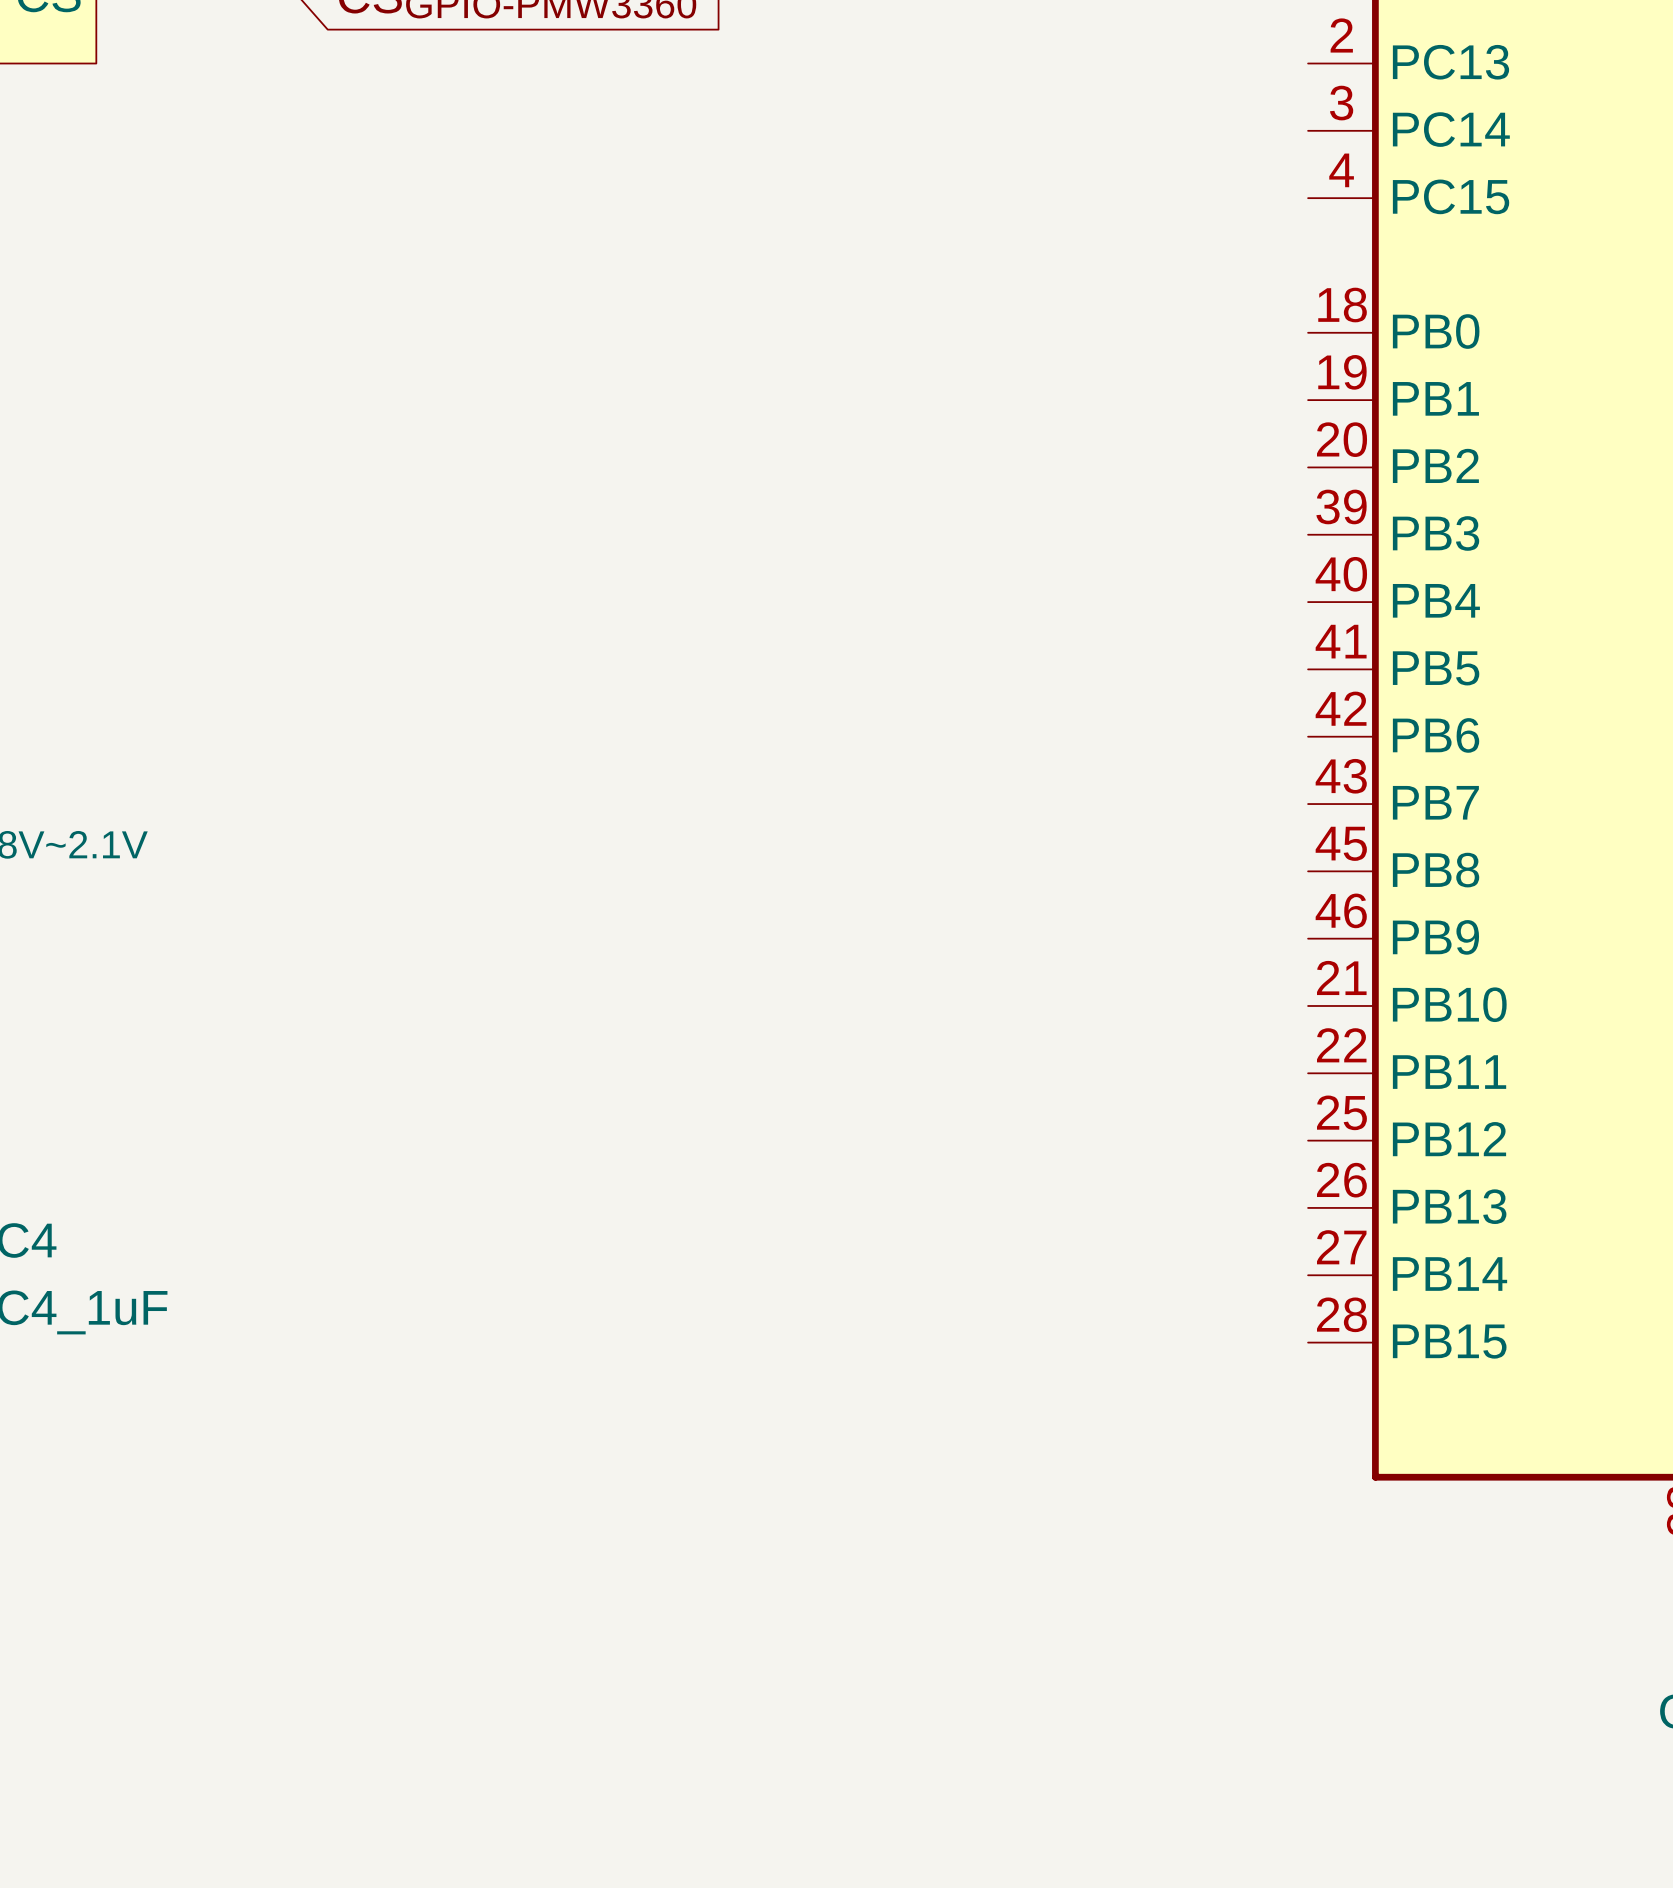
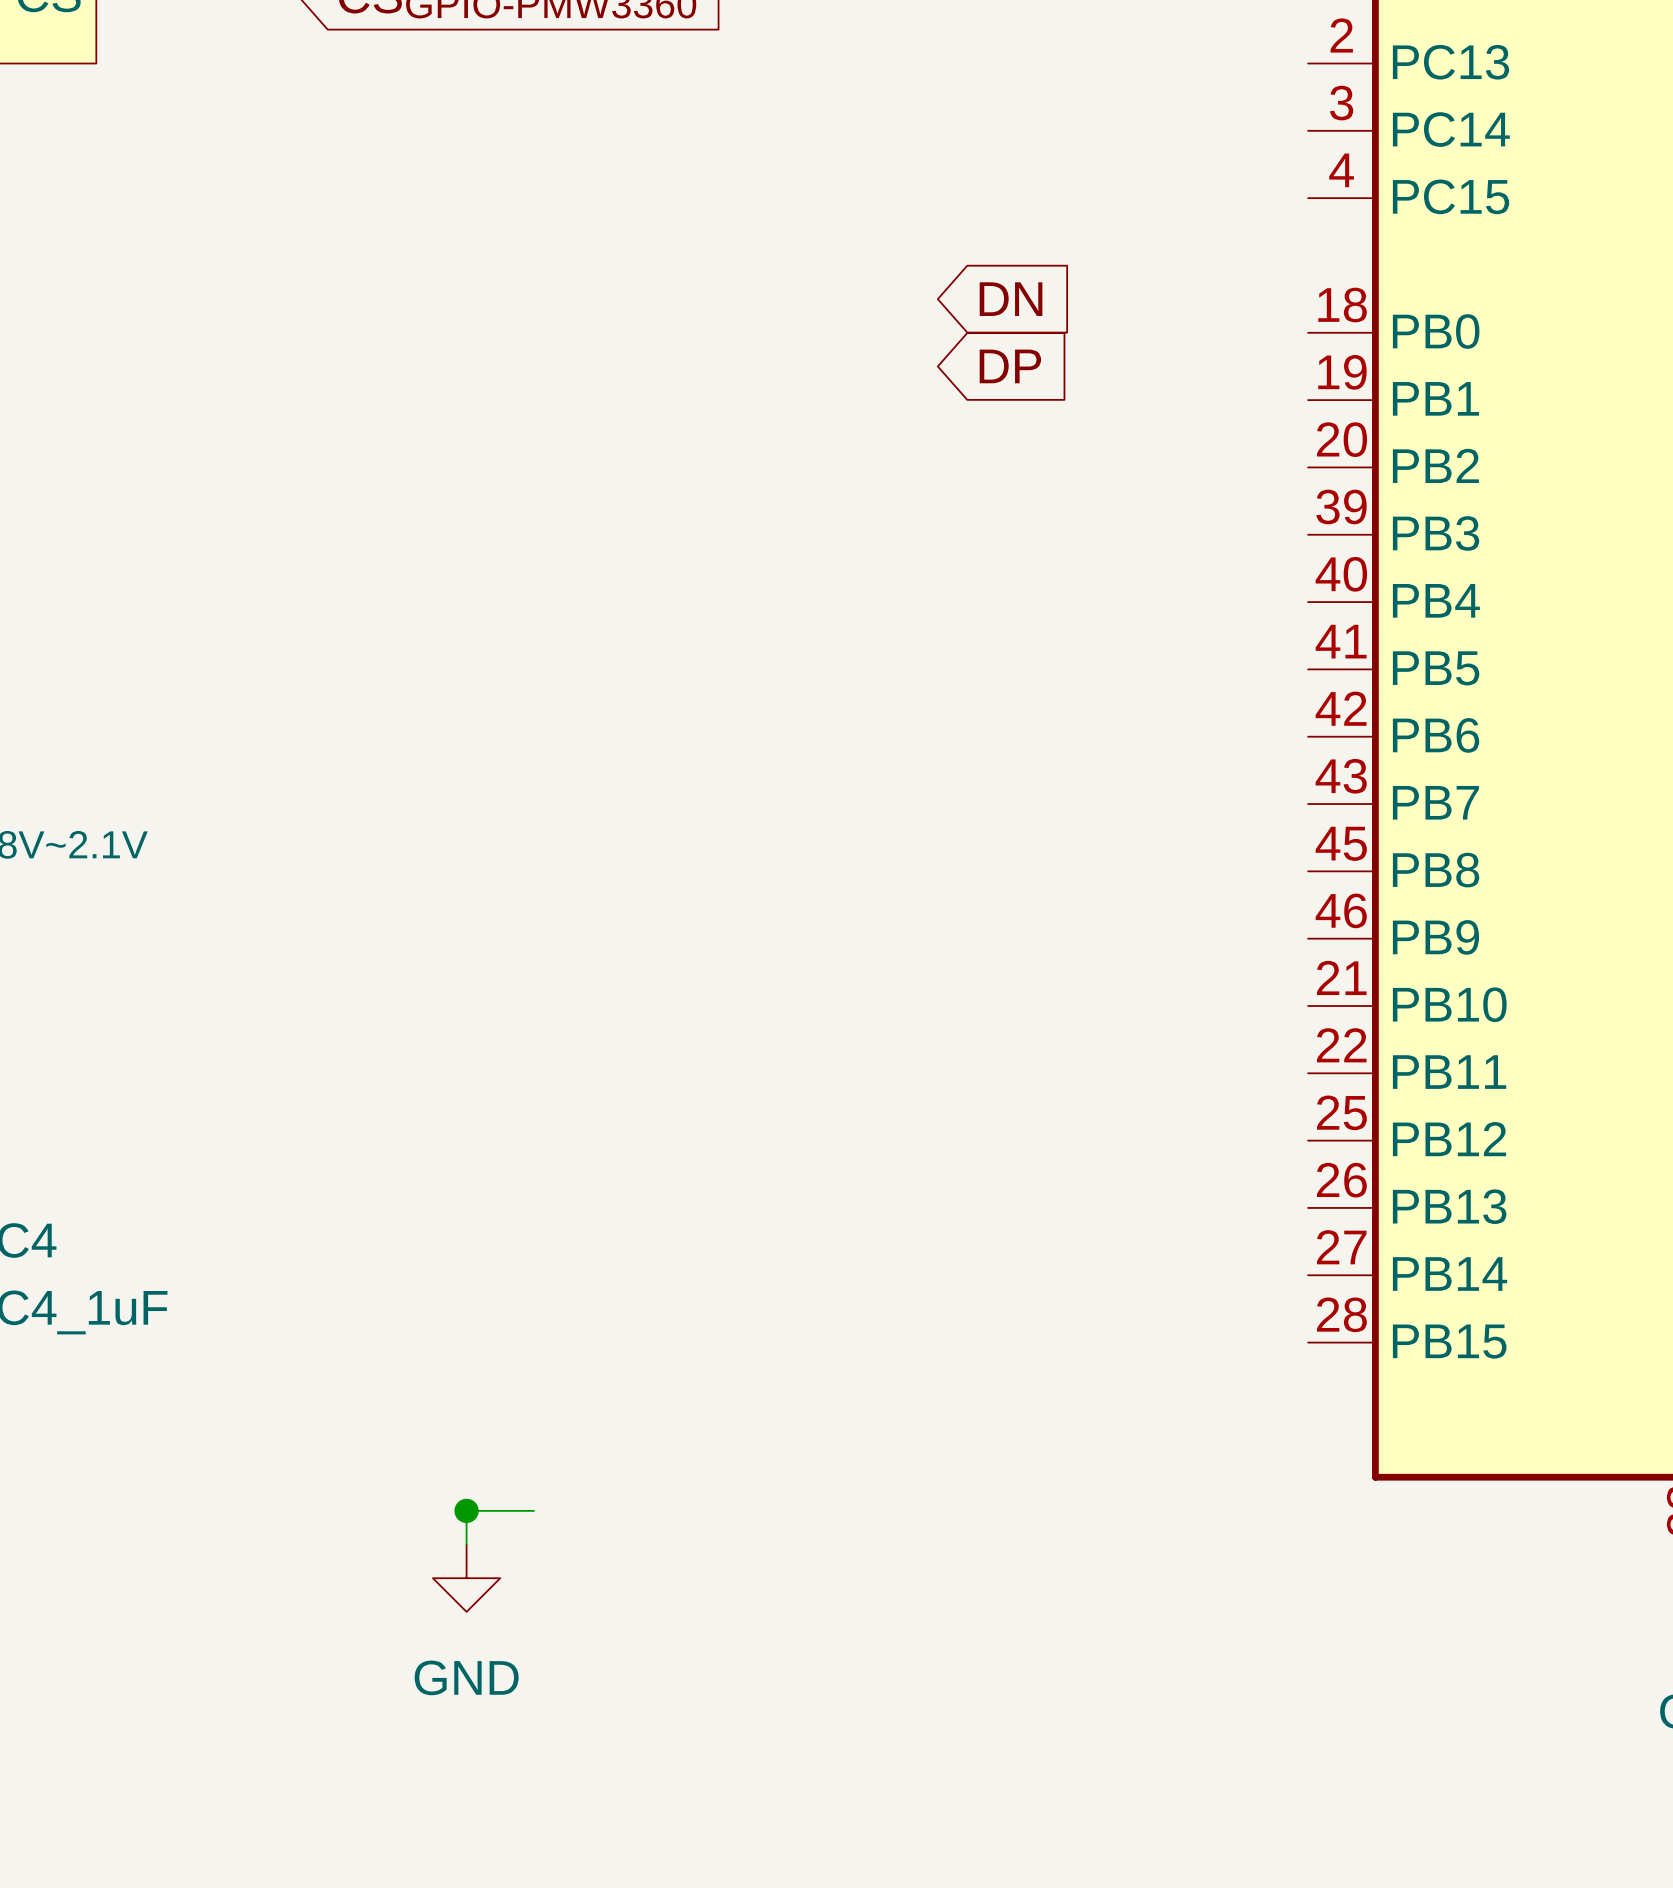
global label: none -> DN (1011, 299)
global label: none -> DP (1010, 366)
junction: none -> (466, 1510)
wire: none -> (533, 1510) (466, 1510) (466, 1544)
power symbol: none -> GND (466, 1578)

